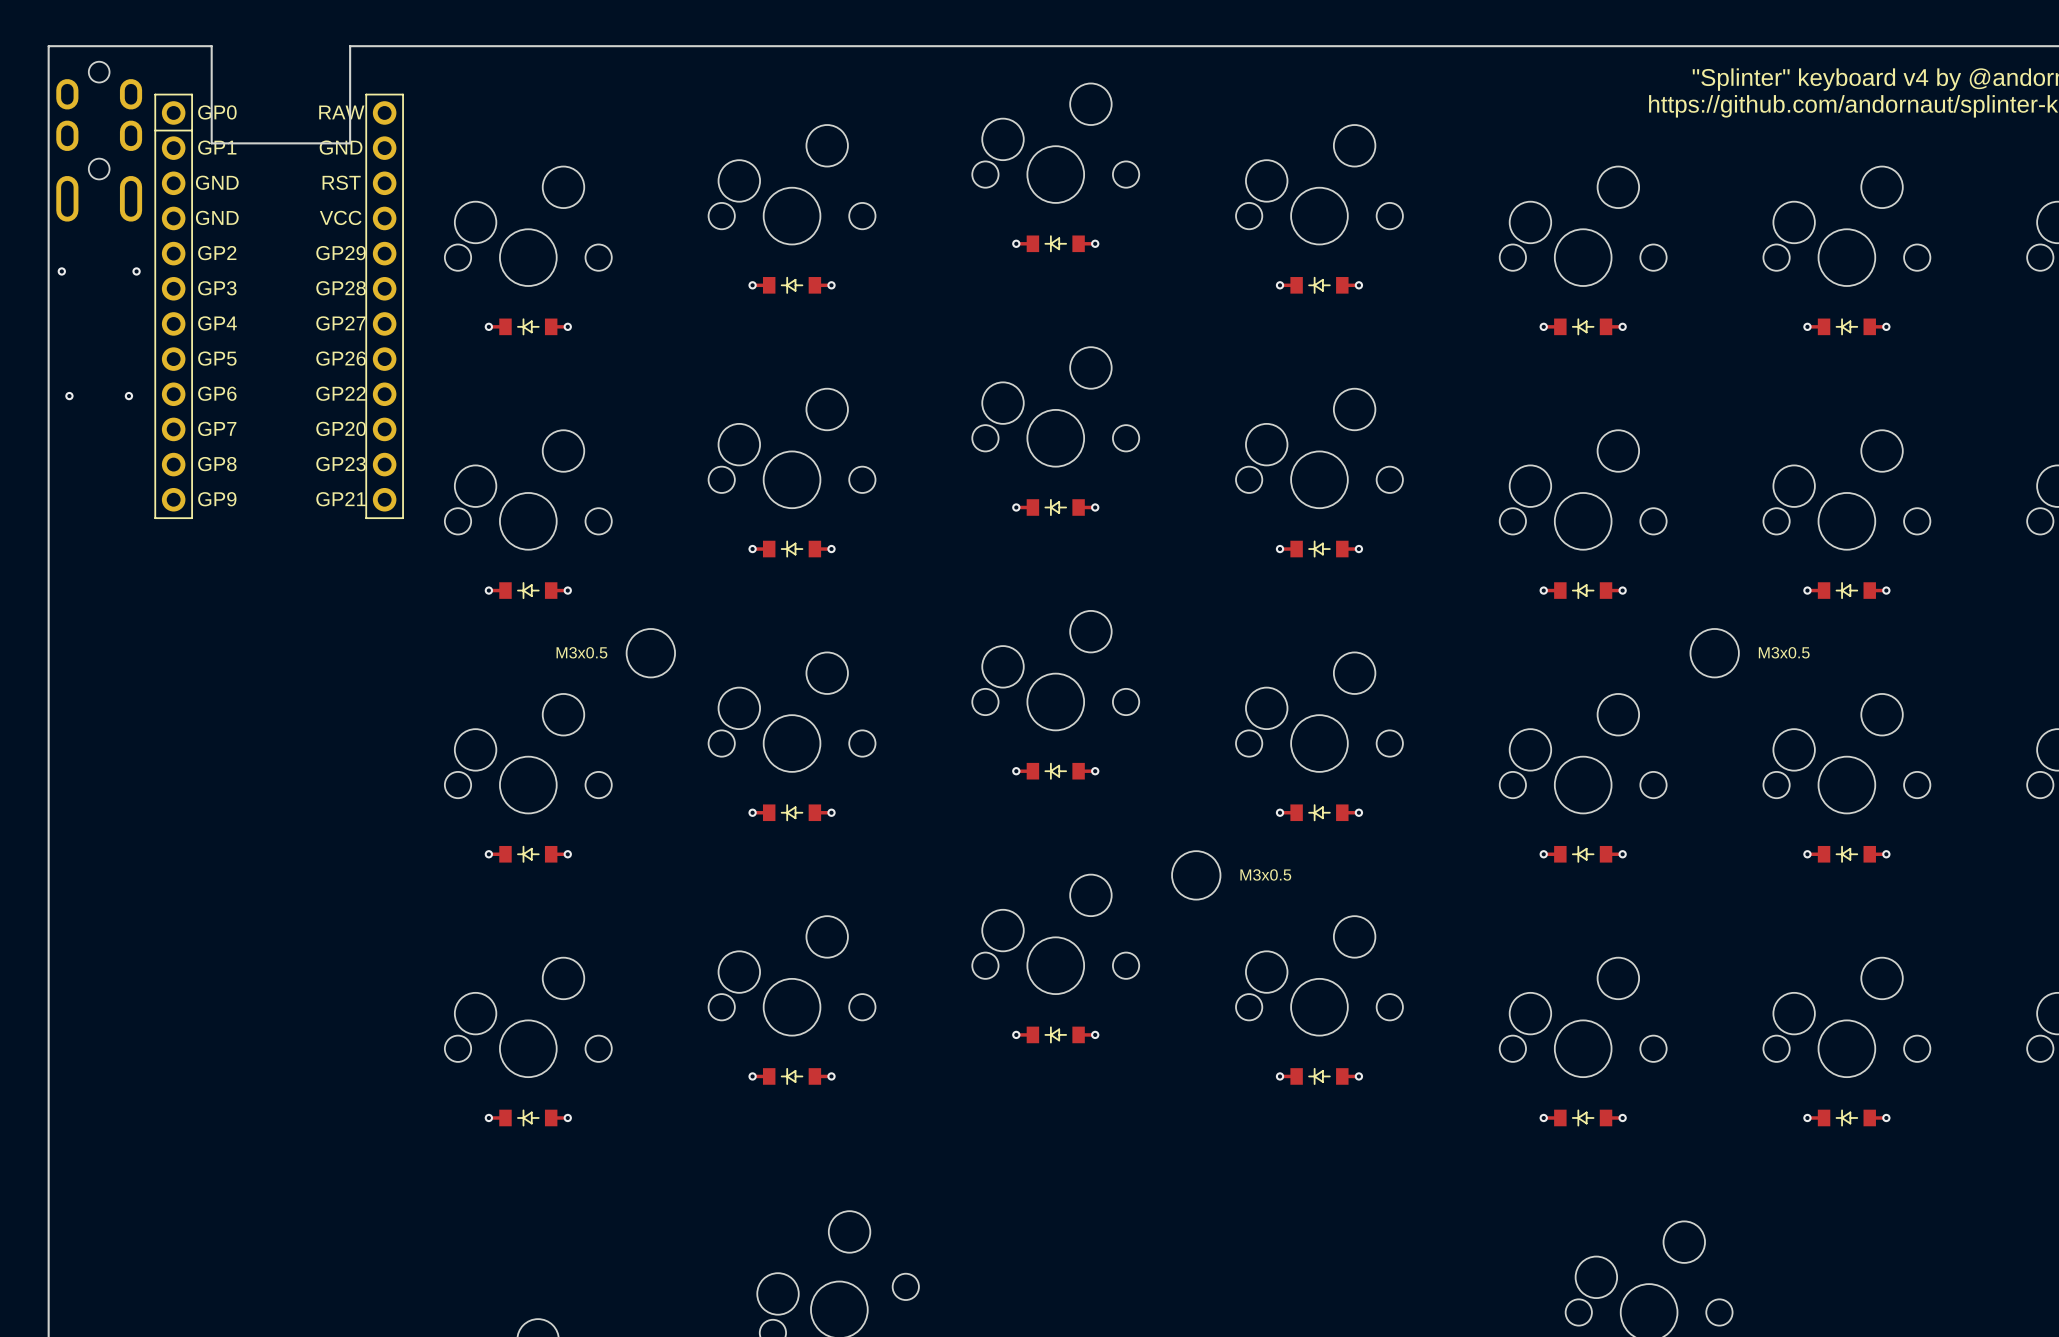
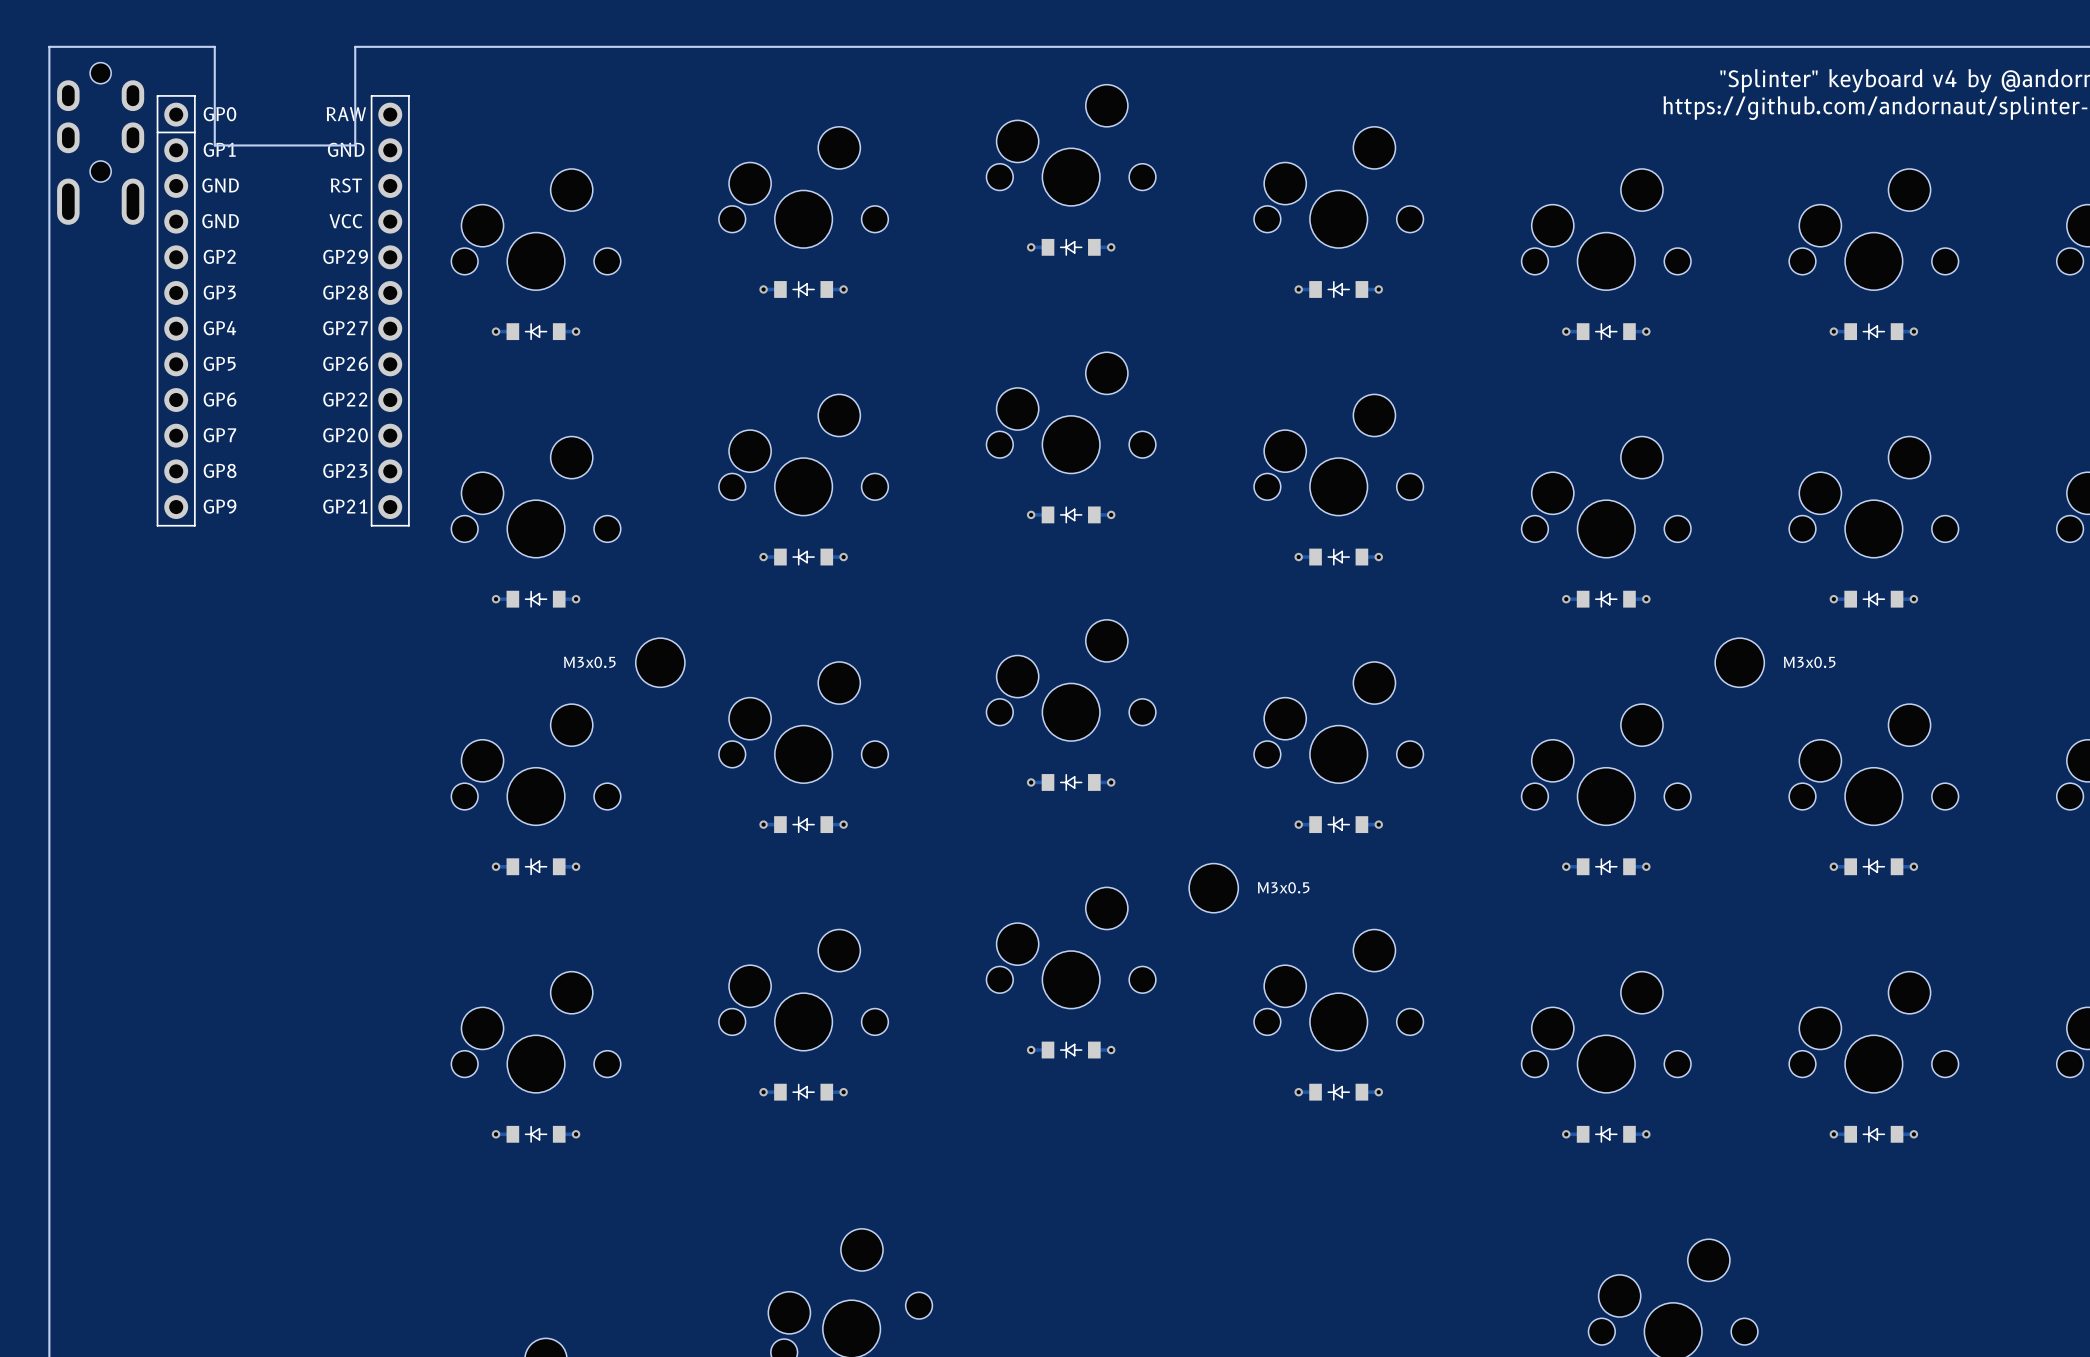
via: (61, 271) -> none
via: (136, 271) -> none
via: (69, 396) -> none
via: (128, 396) -> none

